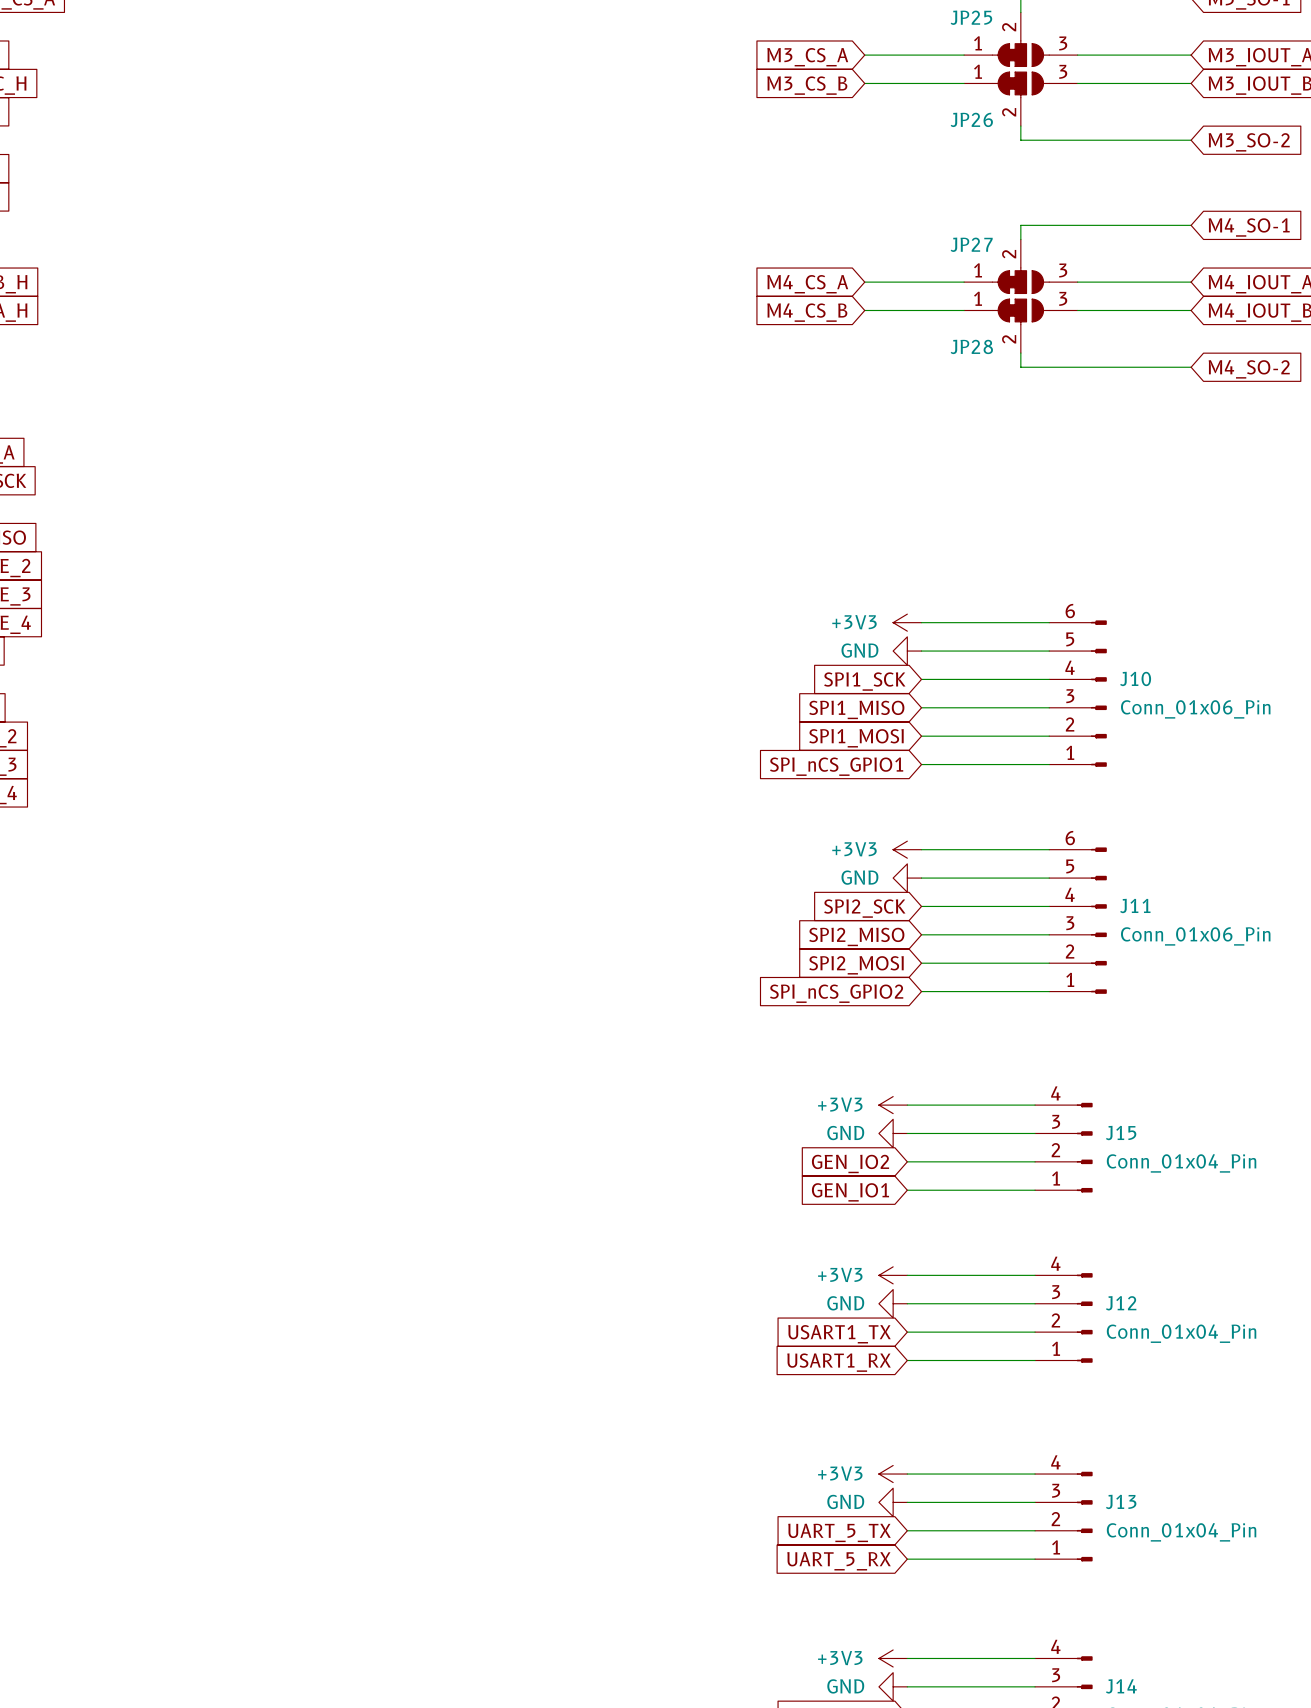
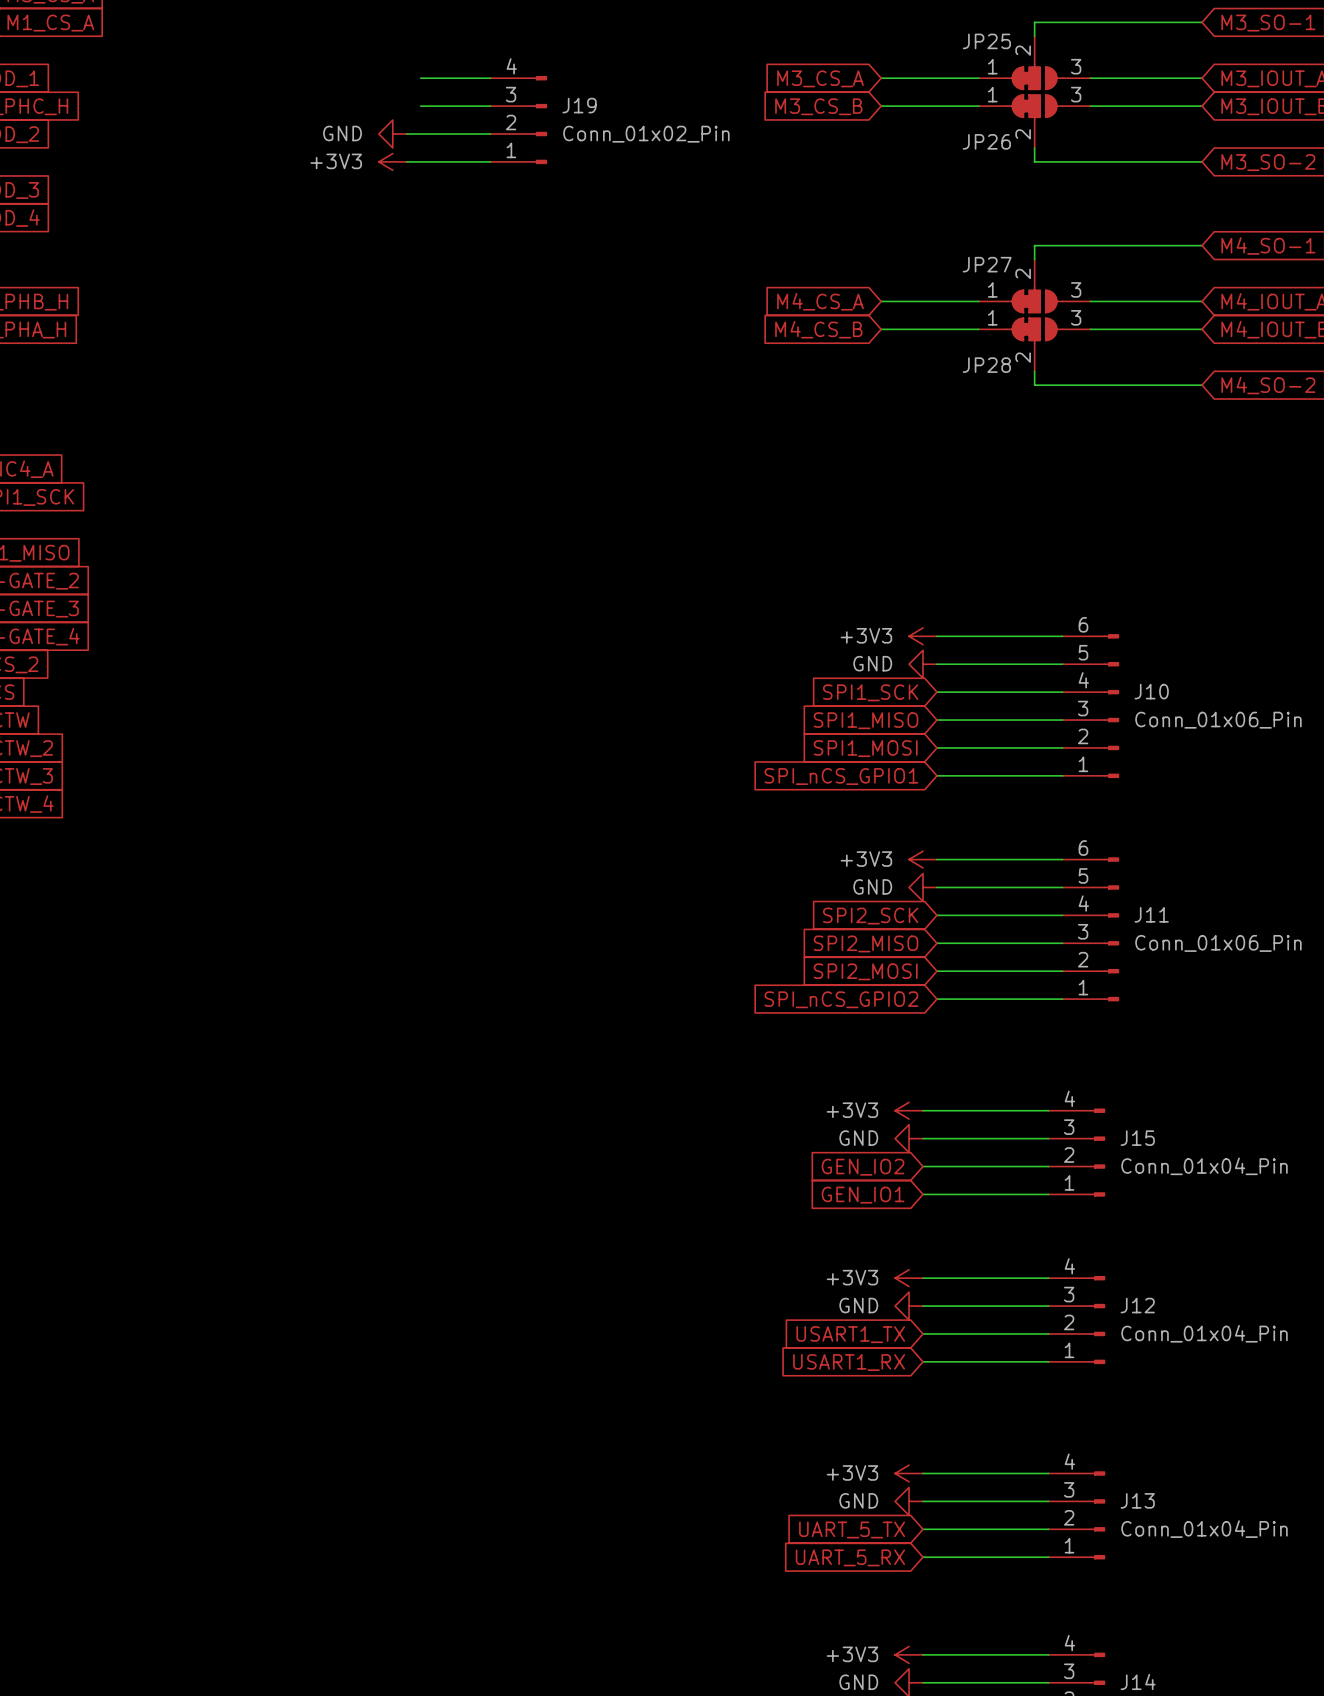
wire: none -> (420, 78) (490, 78)
wire: none -> (420, 106) (490, 106)
J19: none -> Conn_01x02_Pin (518, 120)
power symbol: none -> GND (392, 134)
wire: none -> (406, 134) (490, 134)
power symbol: none -> +3V3 (392, 161)
wire: none -> (406, 161) (490, 161)

